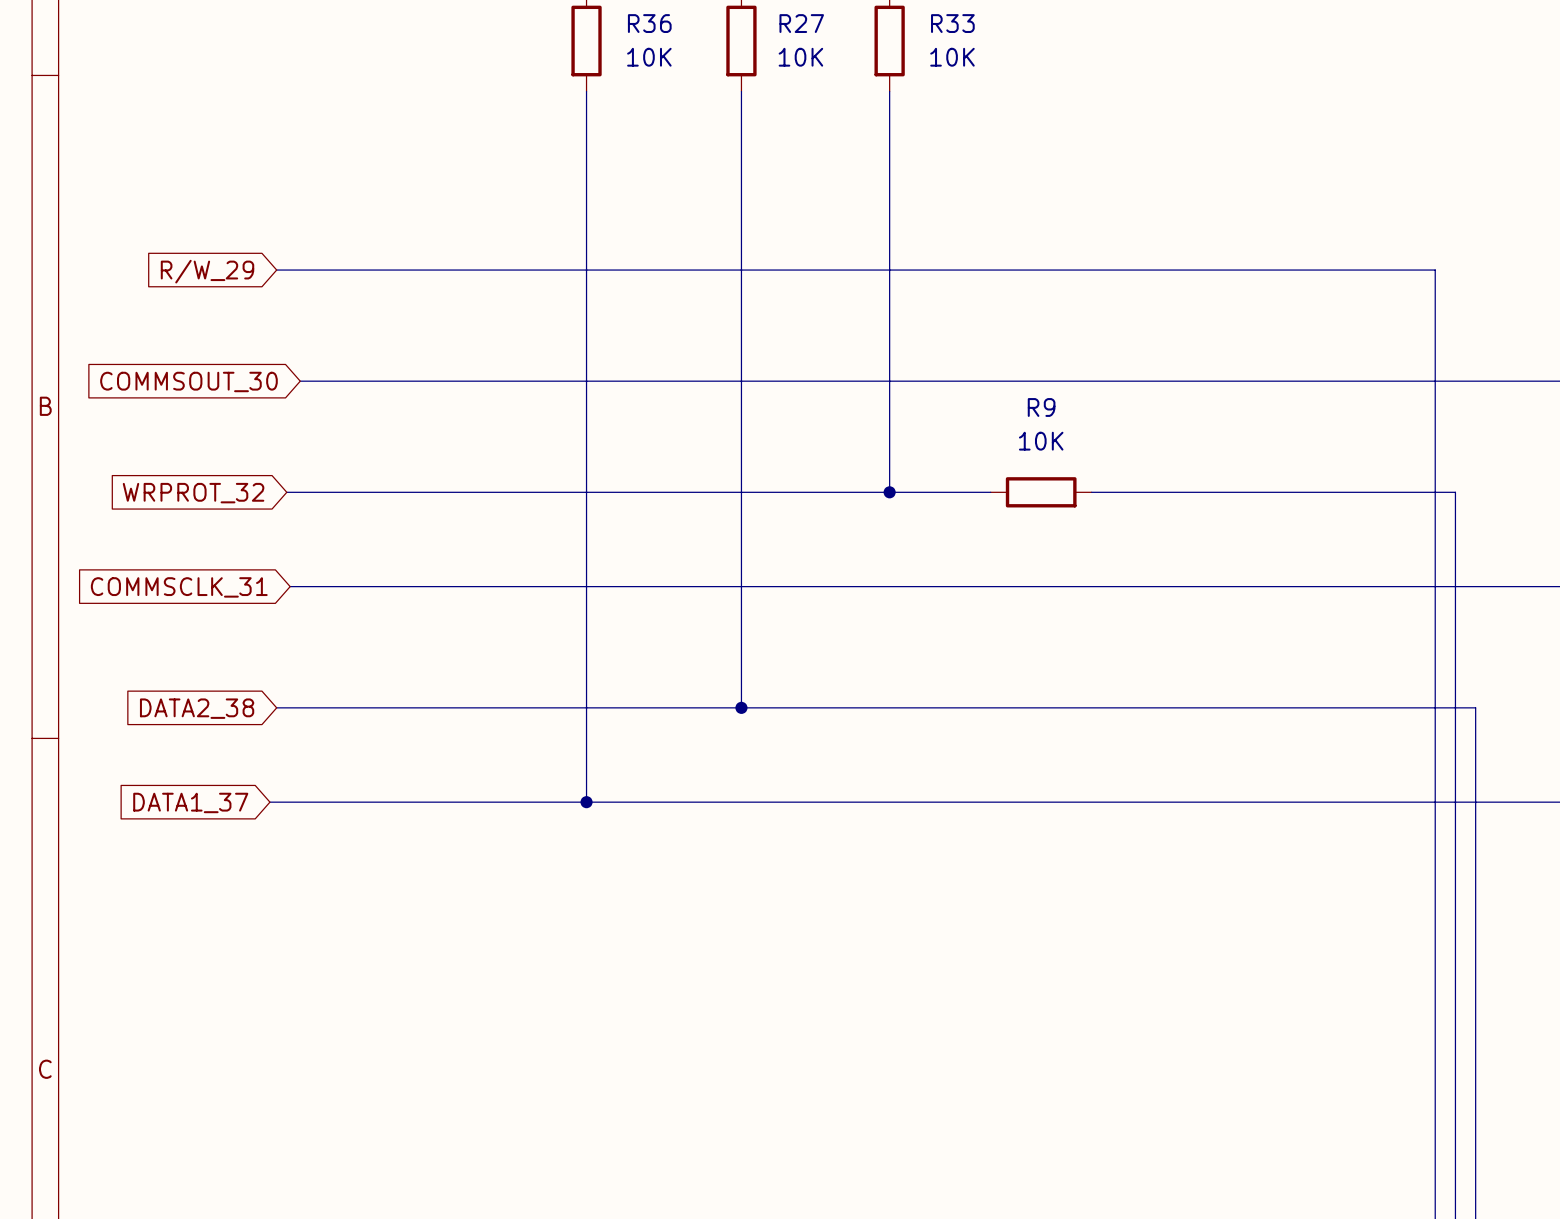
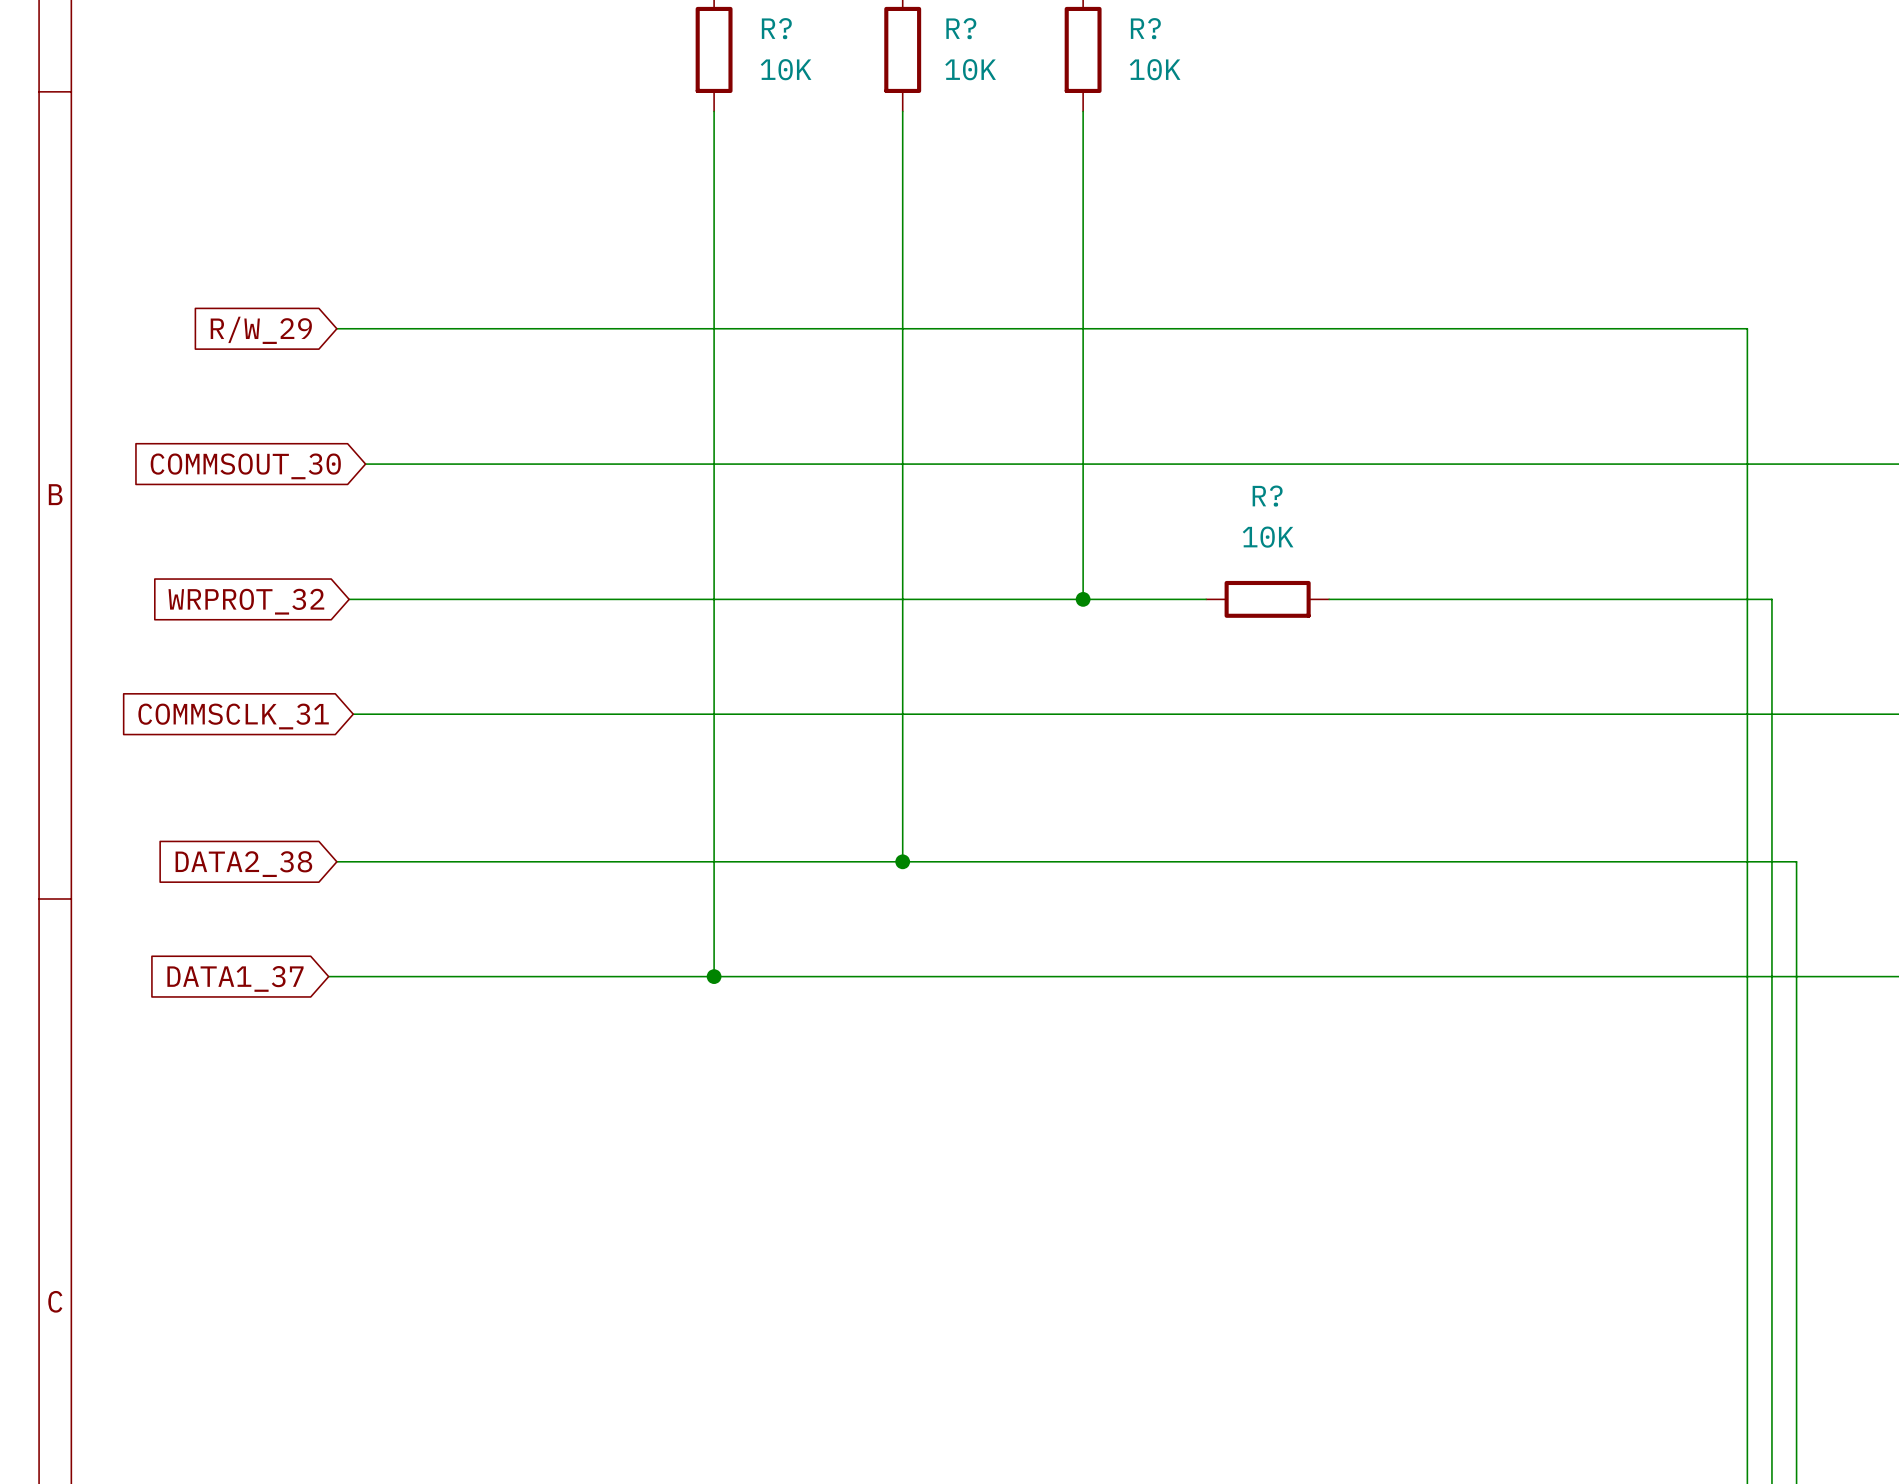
R36 name: R36 (649, 23) -> R? (776, 28)
R27 name: R27 (801, 23) -> R? (961, 28)
R33 name: R33 (952, 23) -> R? (1145, 28)
R9 name: R9 (1041, 407) -> R? (1267, 496)

